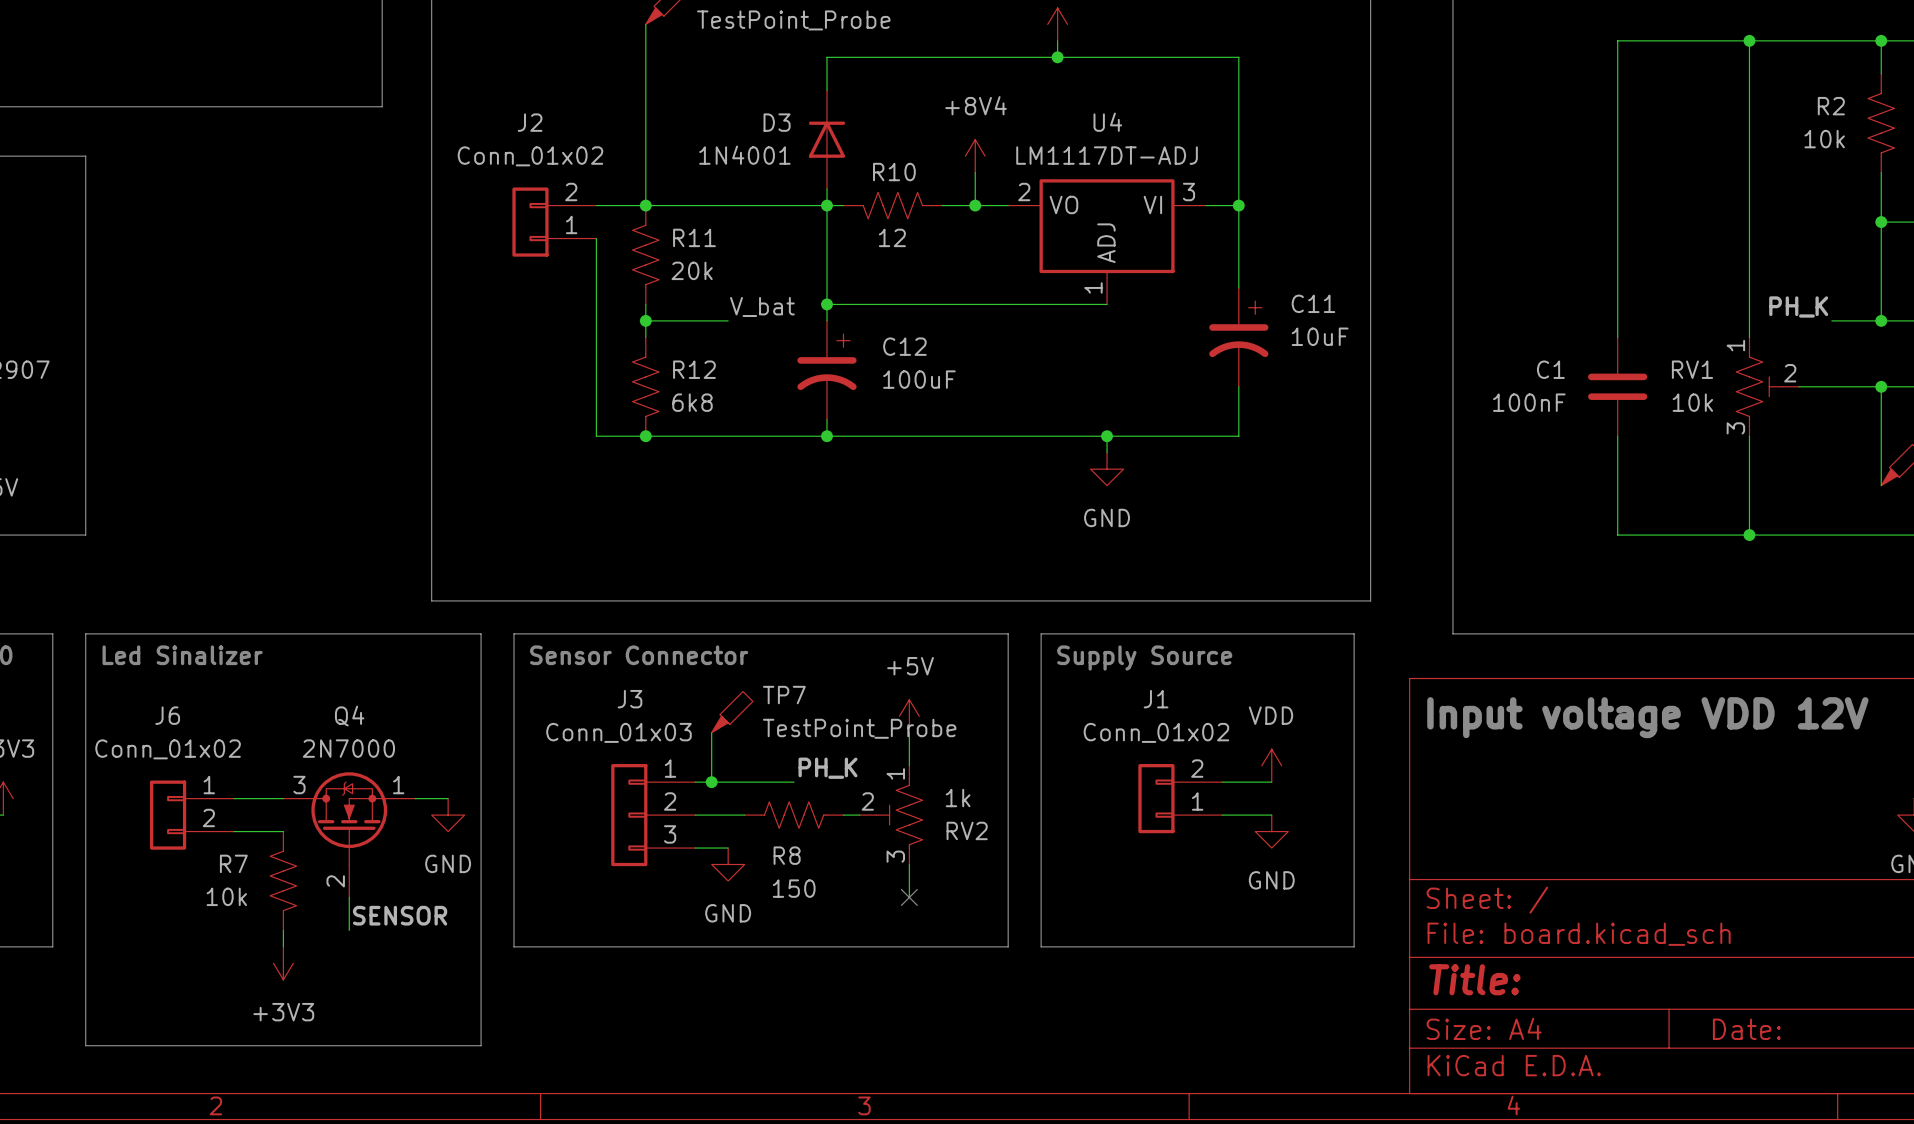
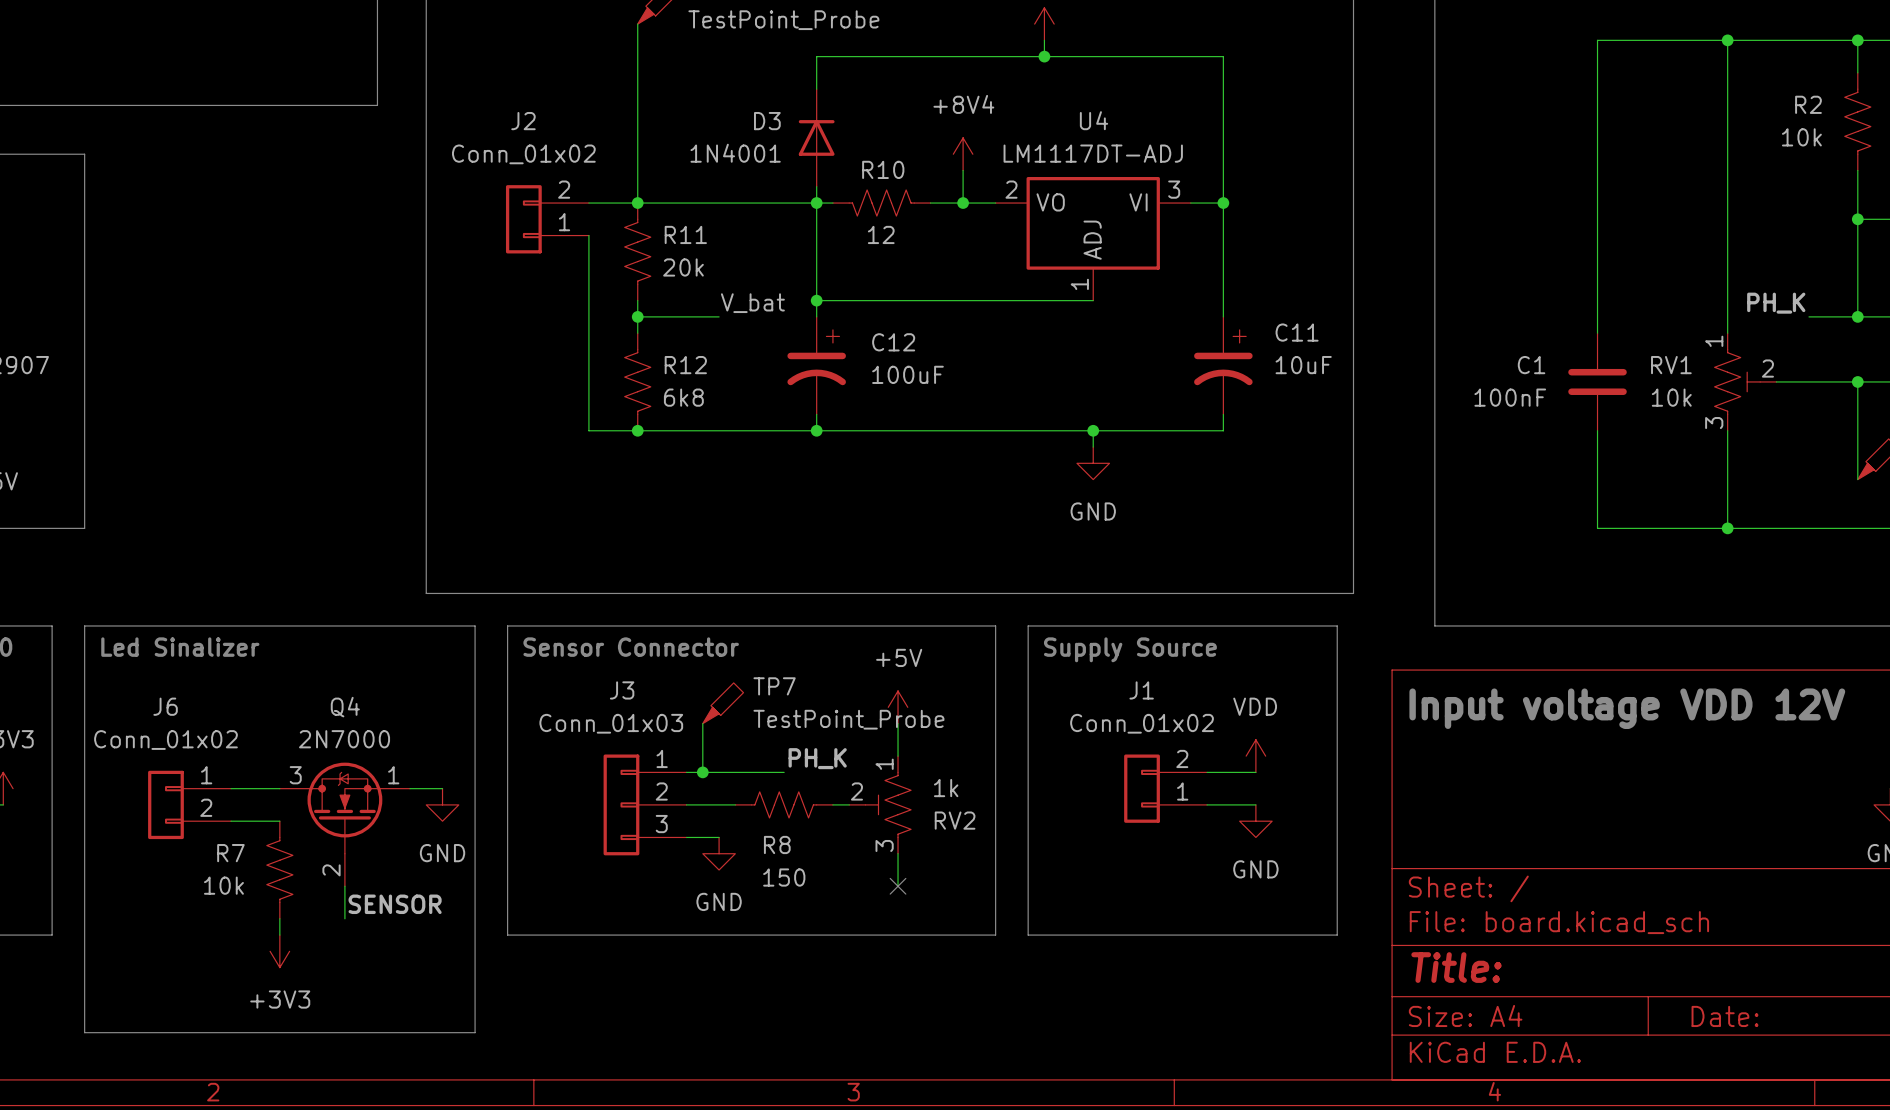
C11 position: (1238, 337) -> (1223, 365)

